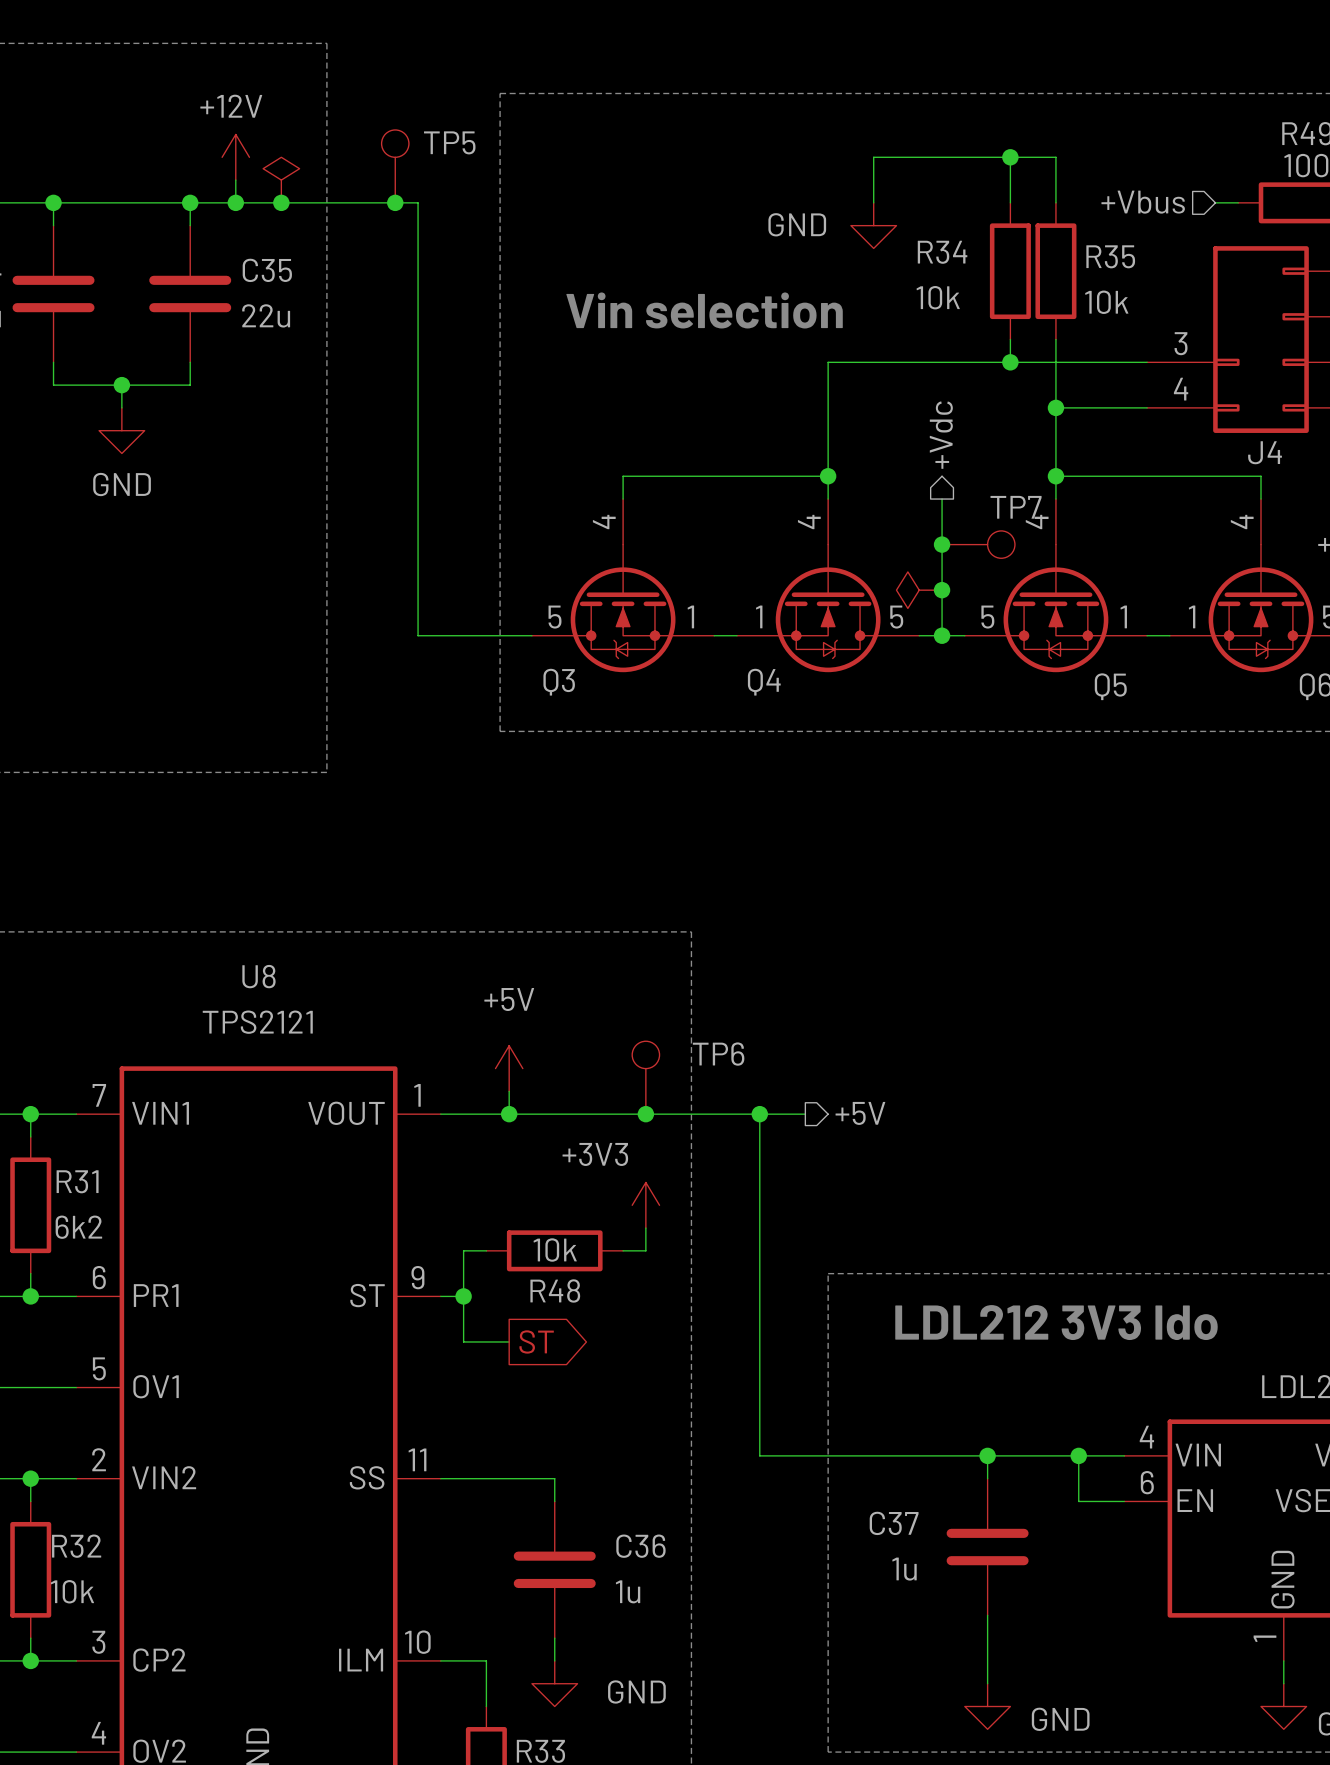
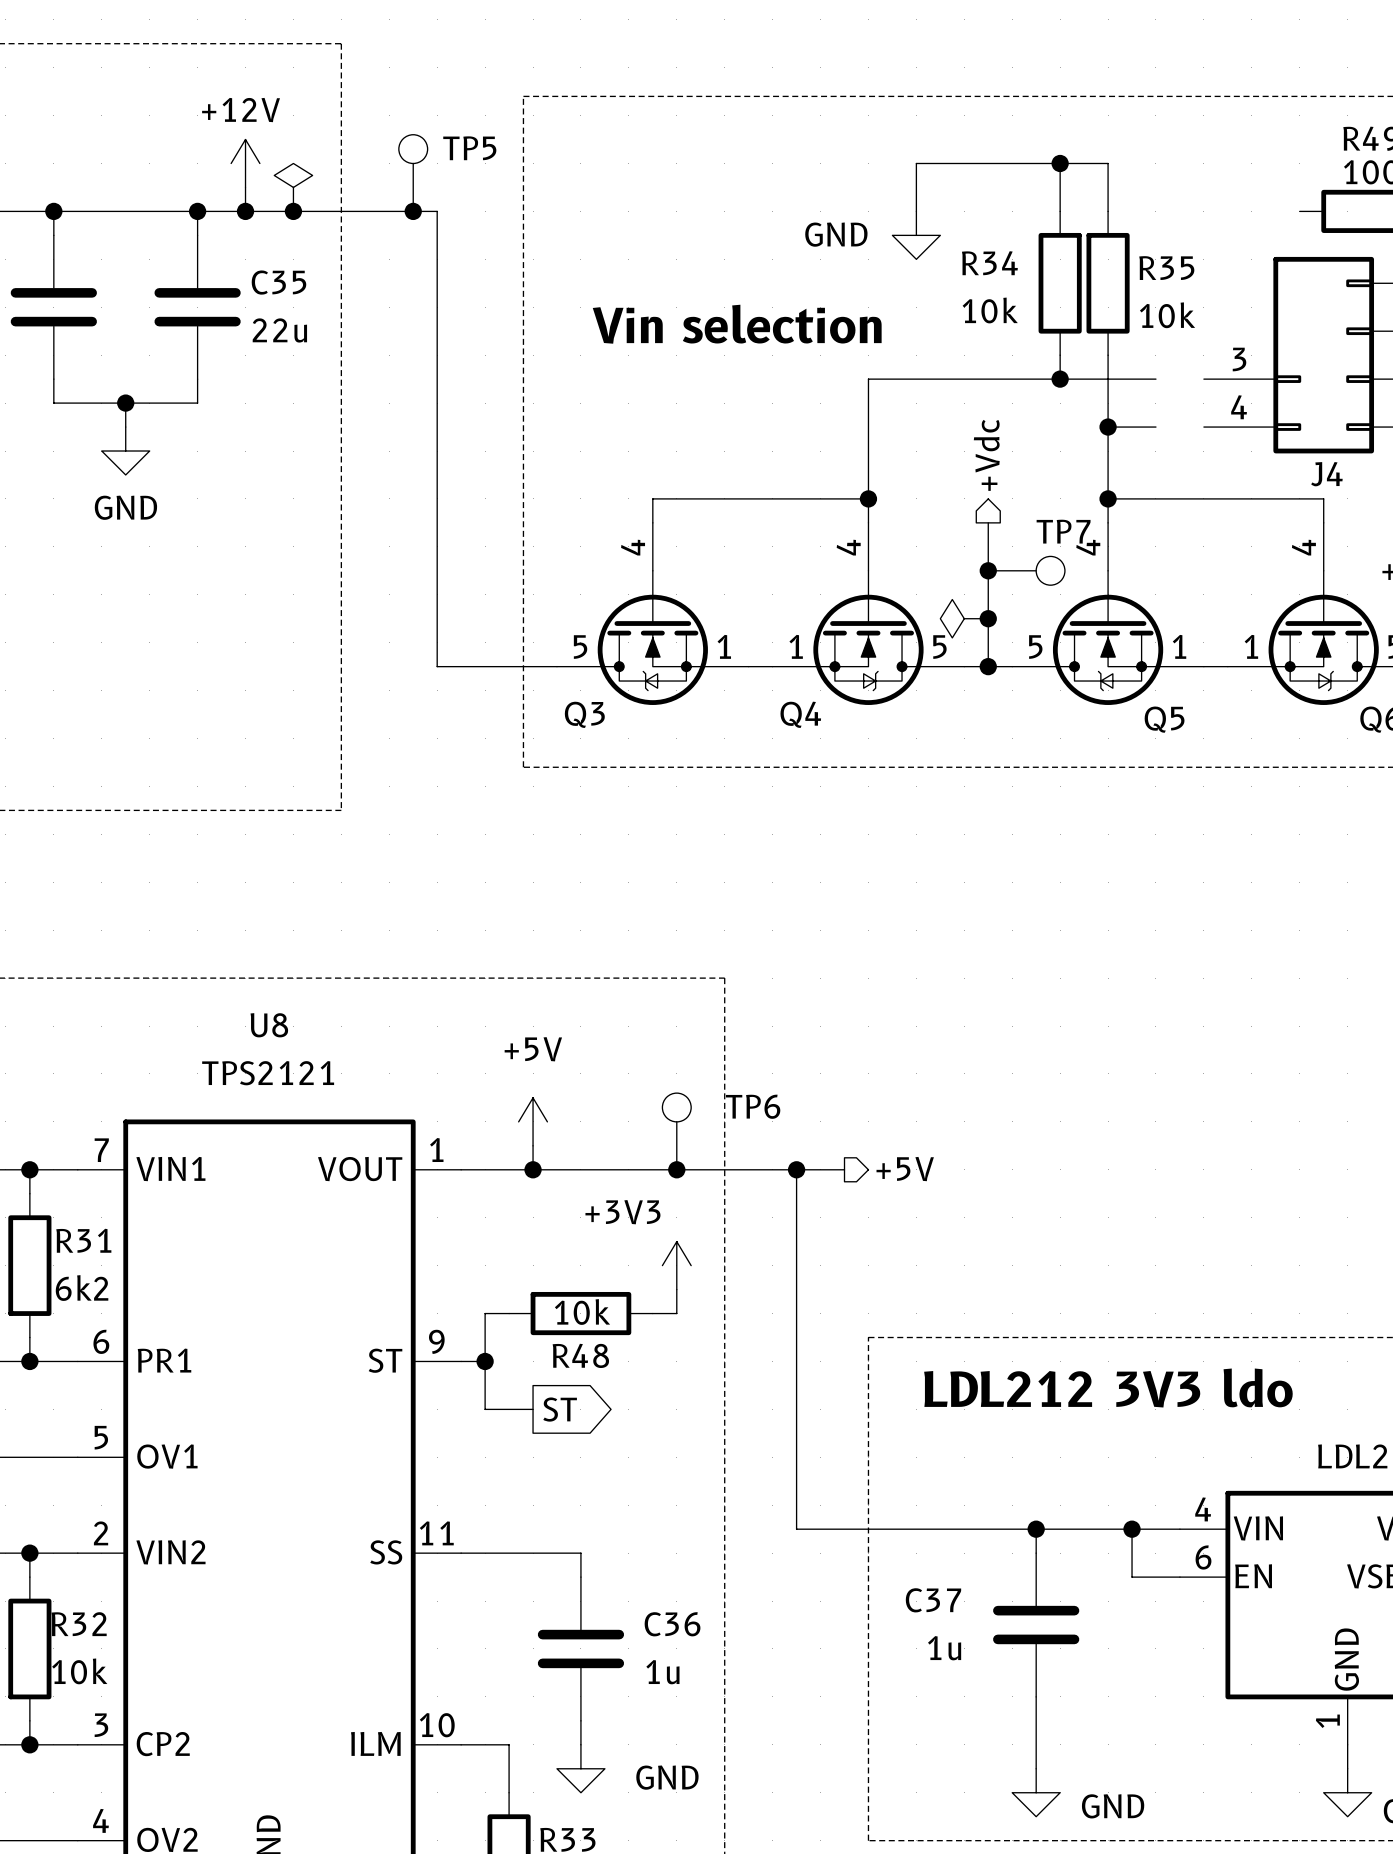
hierarchical label: +Vbus (1143, 202) -> none
wire: (1215, 202) (1238, 202) -> none
wire: (1101, 362) (1147, 362) -> none
wire: (1101, 407) (1147, 407) -> none

